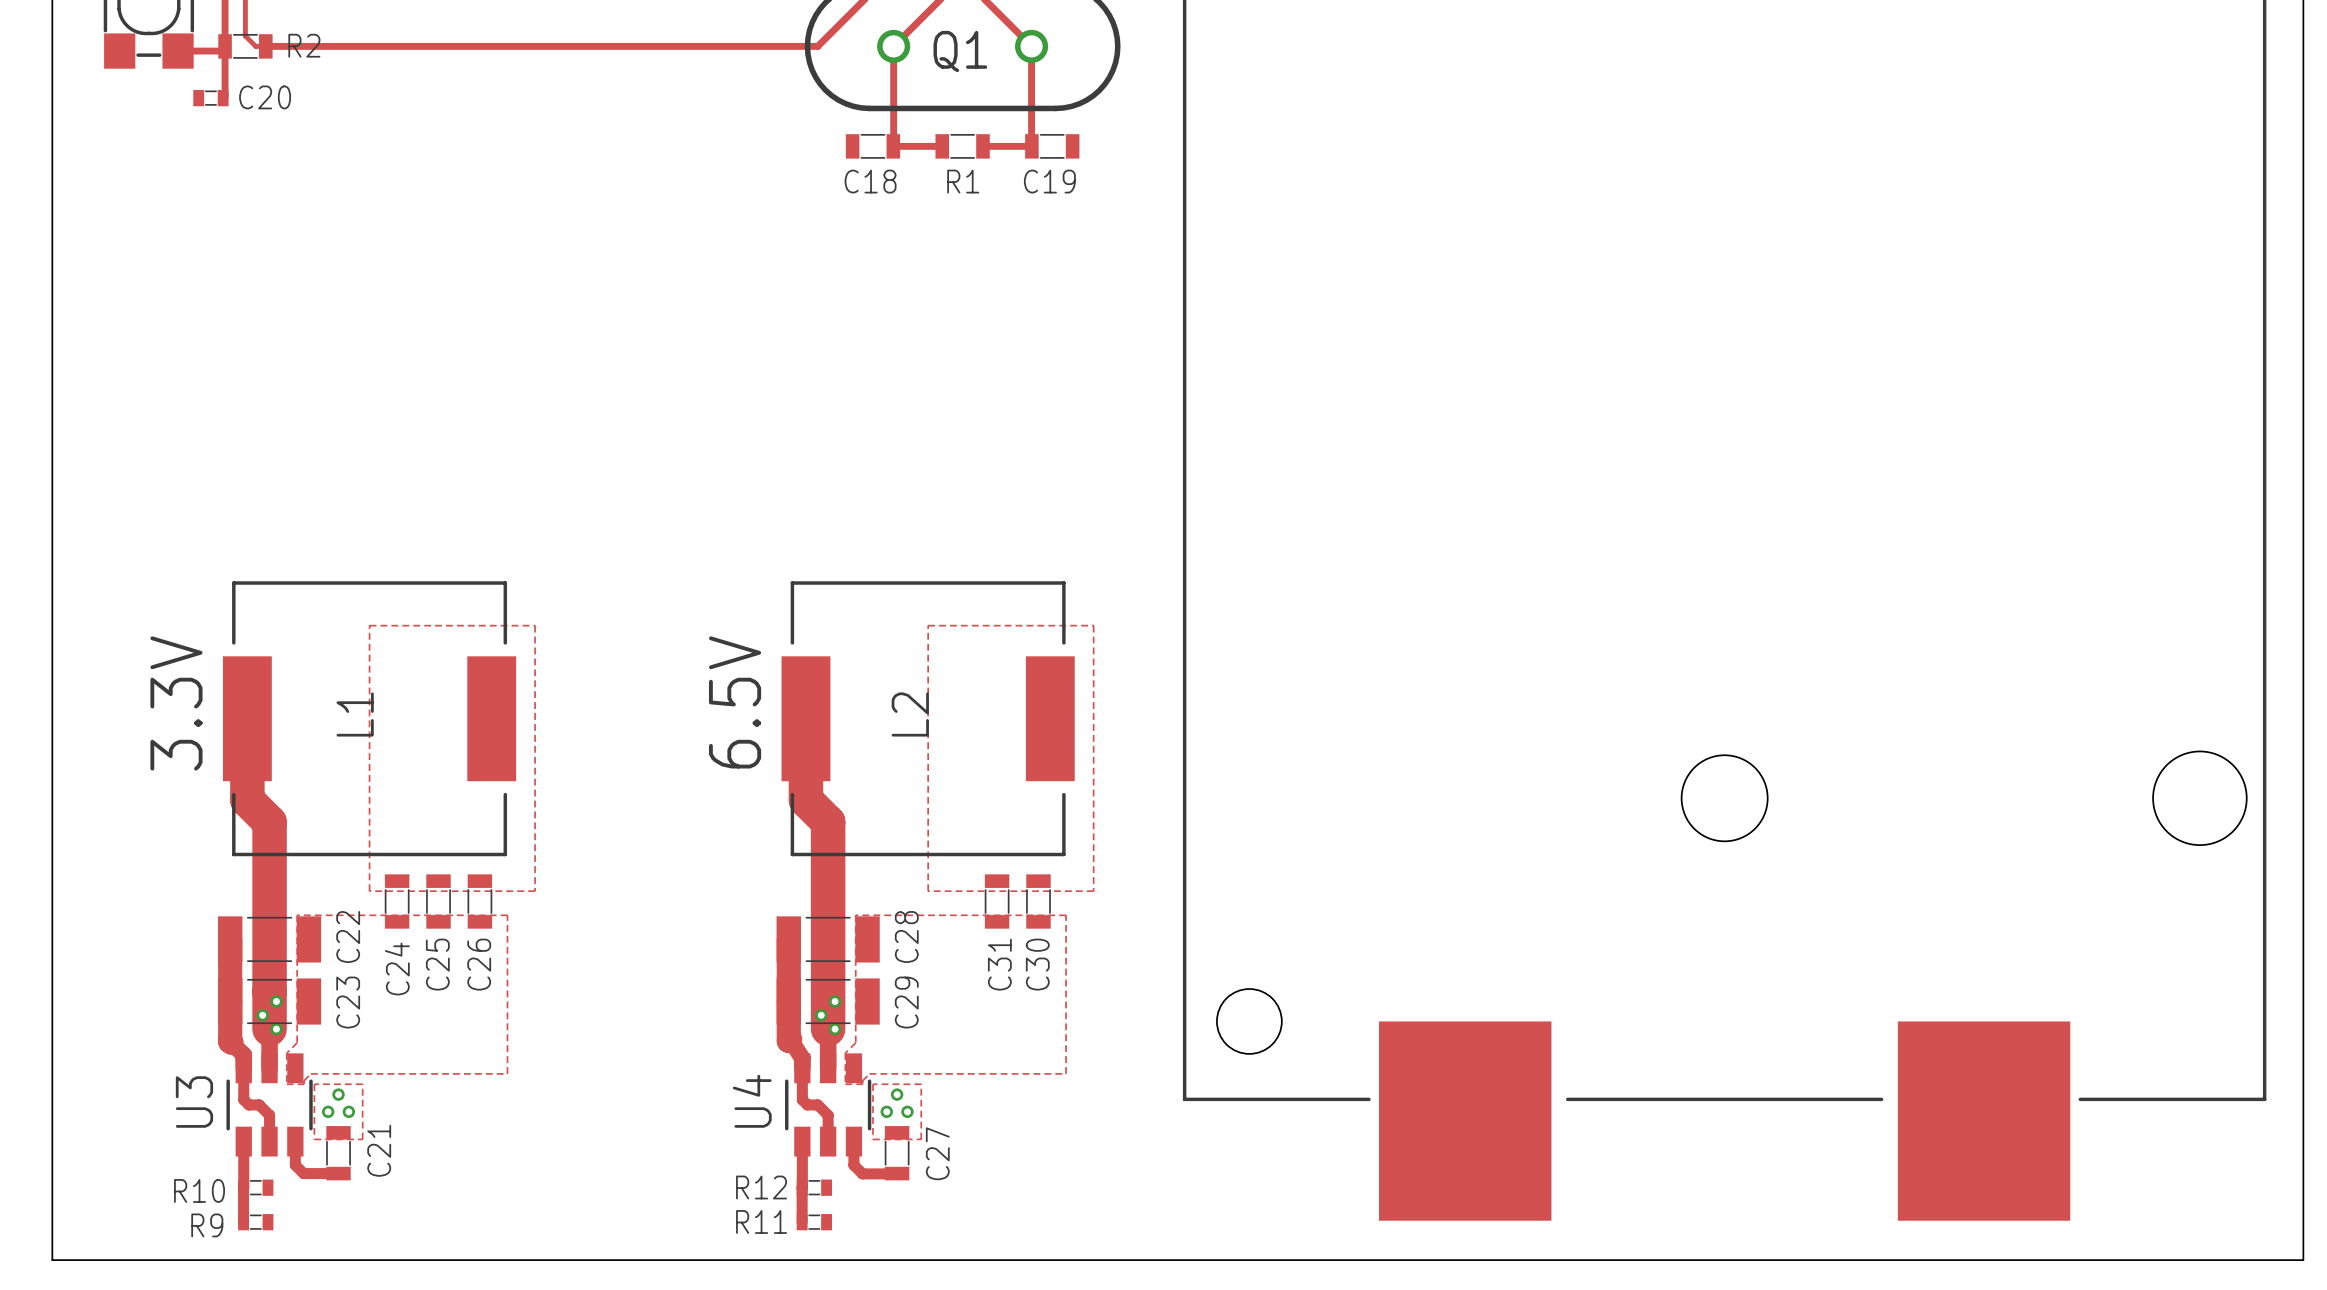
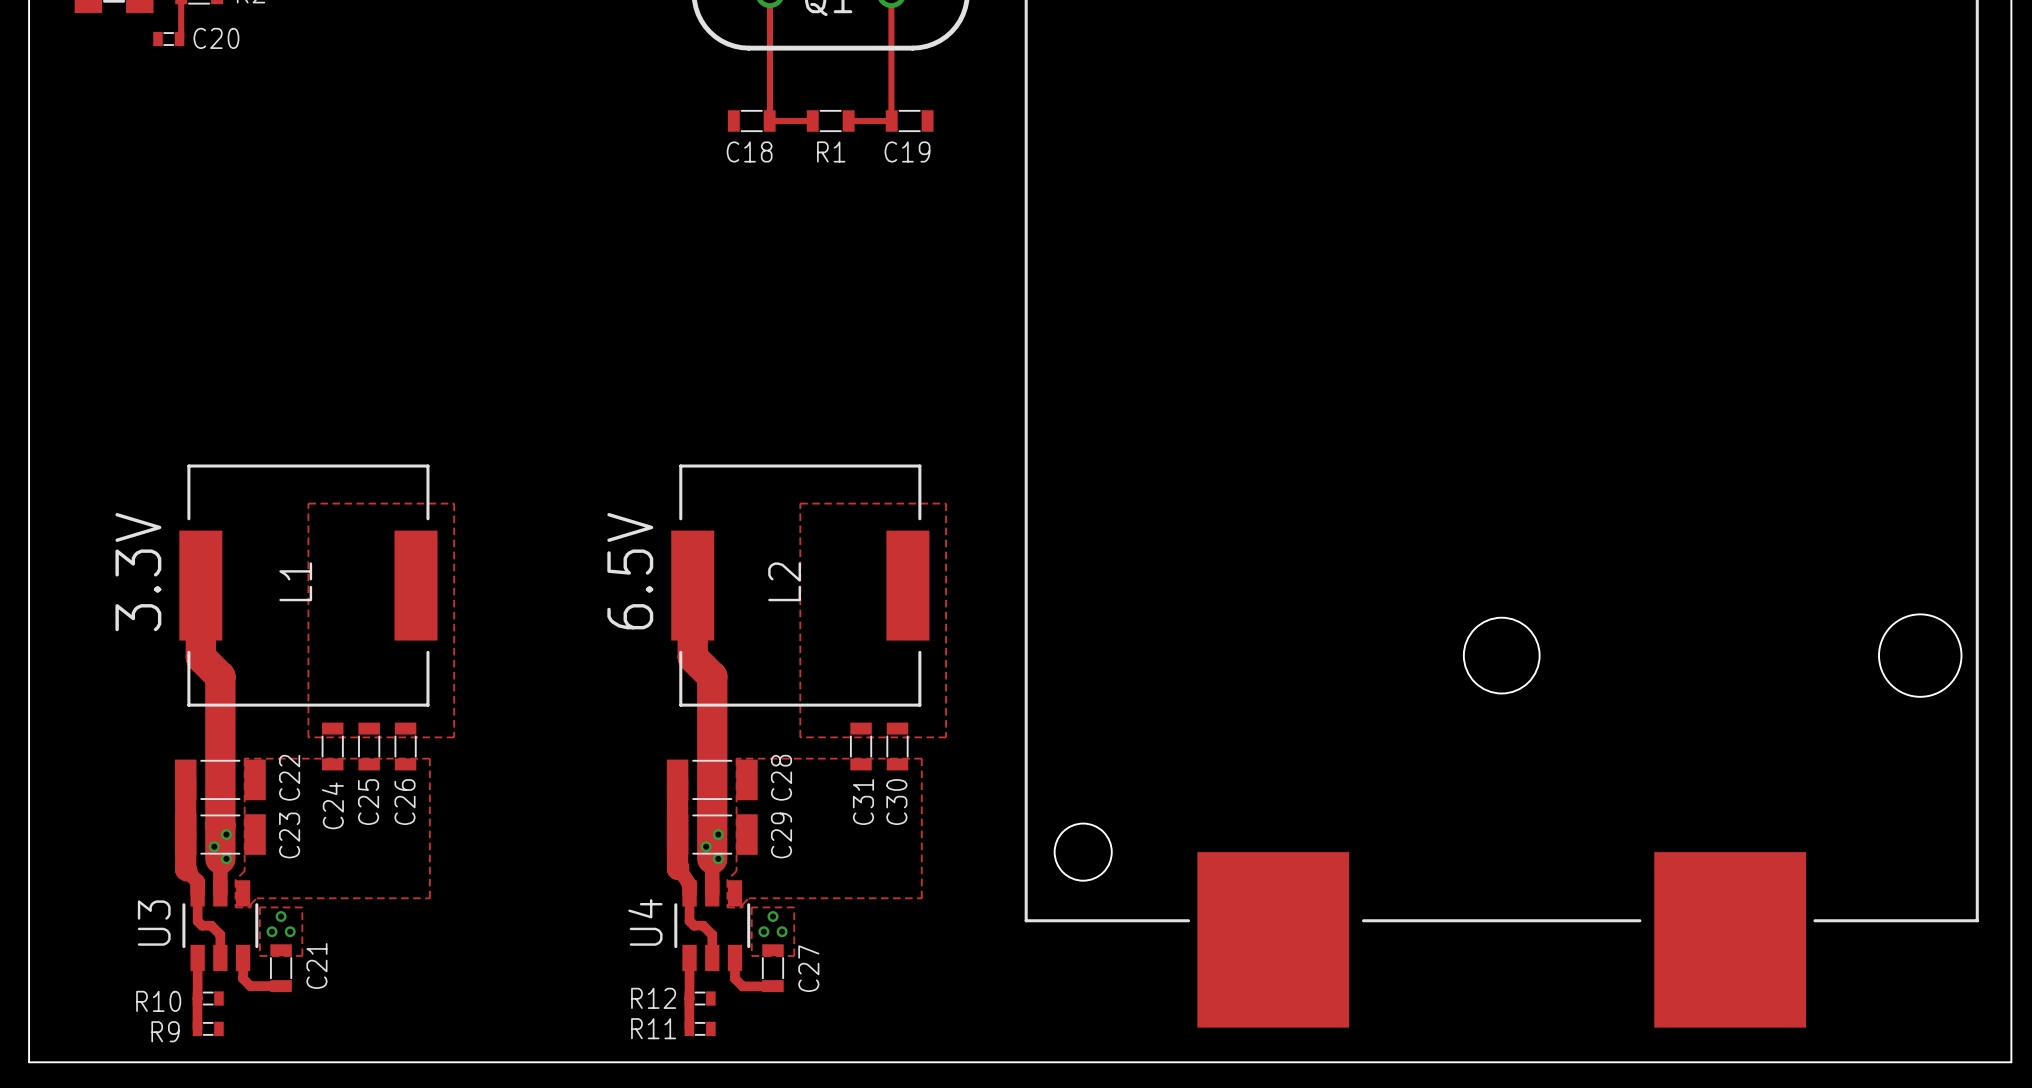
C18 position: (872, 146) -> (751, 121)
top track: (893, 146) (942, 146) -> (769, 81) (769, 120)
R1 position: (962, 146) -> (830, 121)
top track: (982, 146) (1031, 146) -> (891, 120) (891, 81)
C19 position: (1052, 146) -> (909, 121)
top track: none -> (769, 121) (812, 121)
top track: none -> (848, 121) (891, 121)

